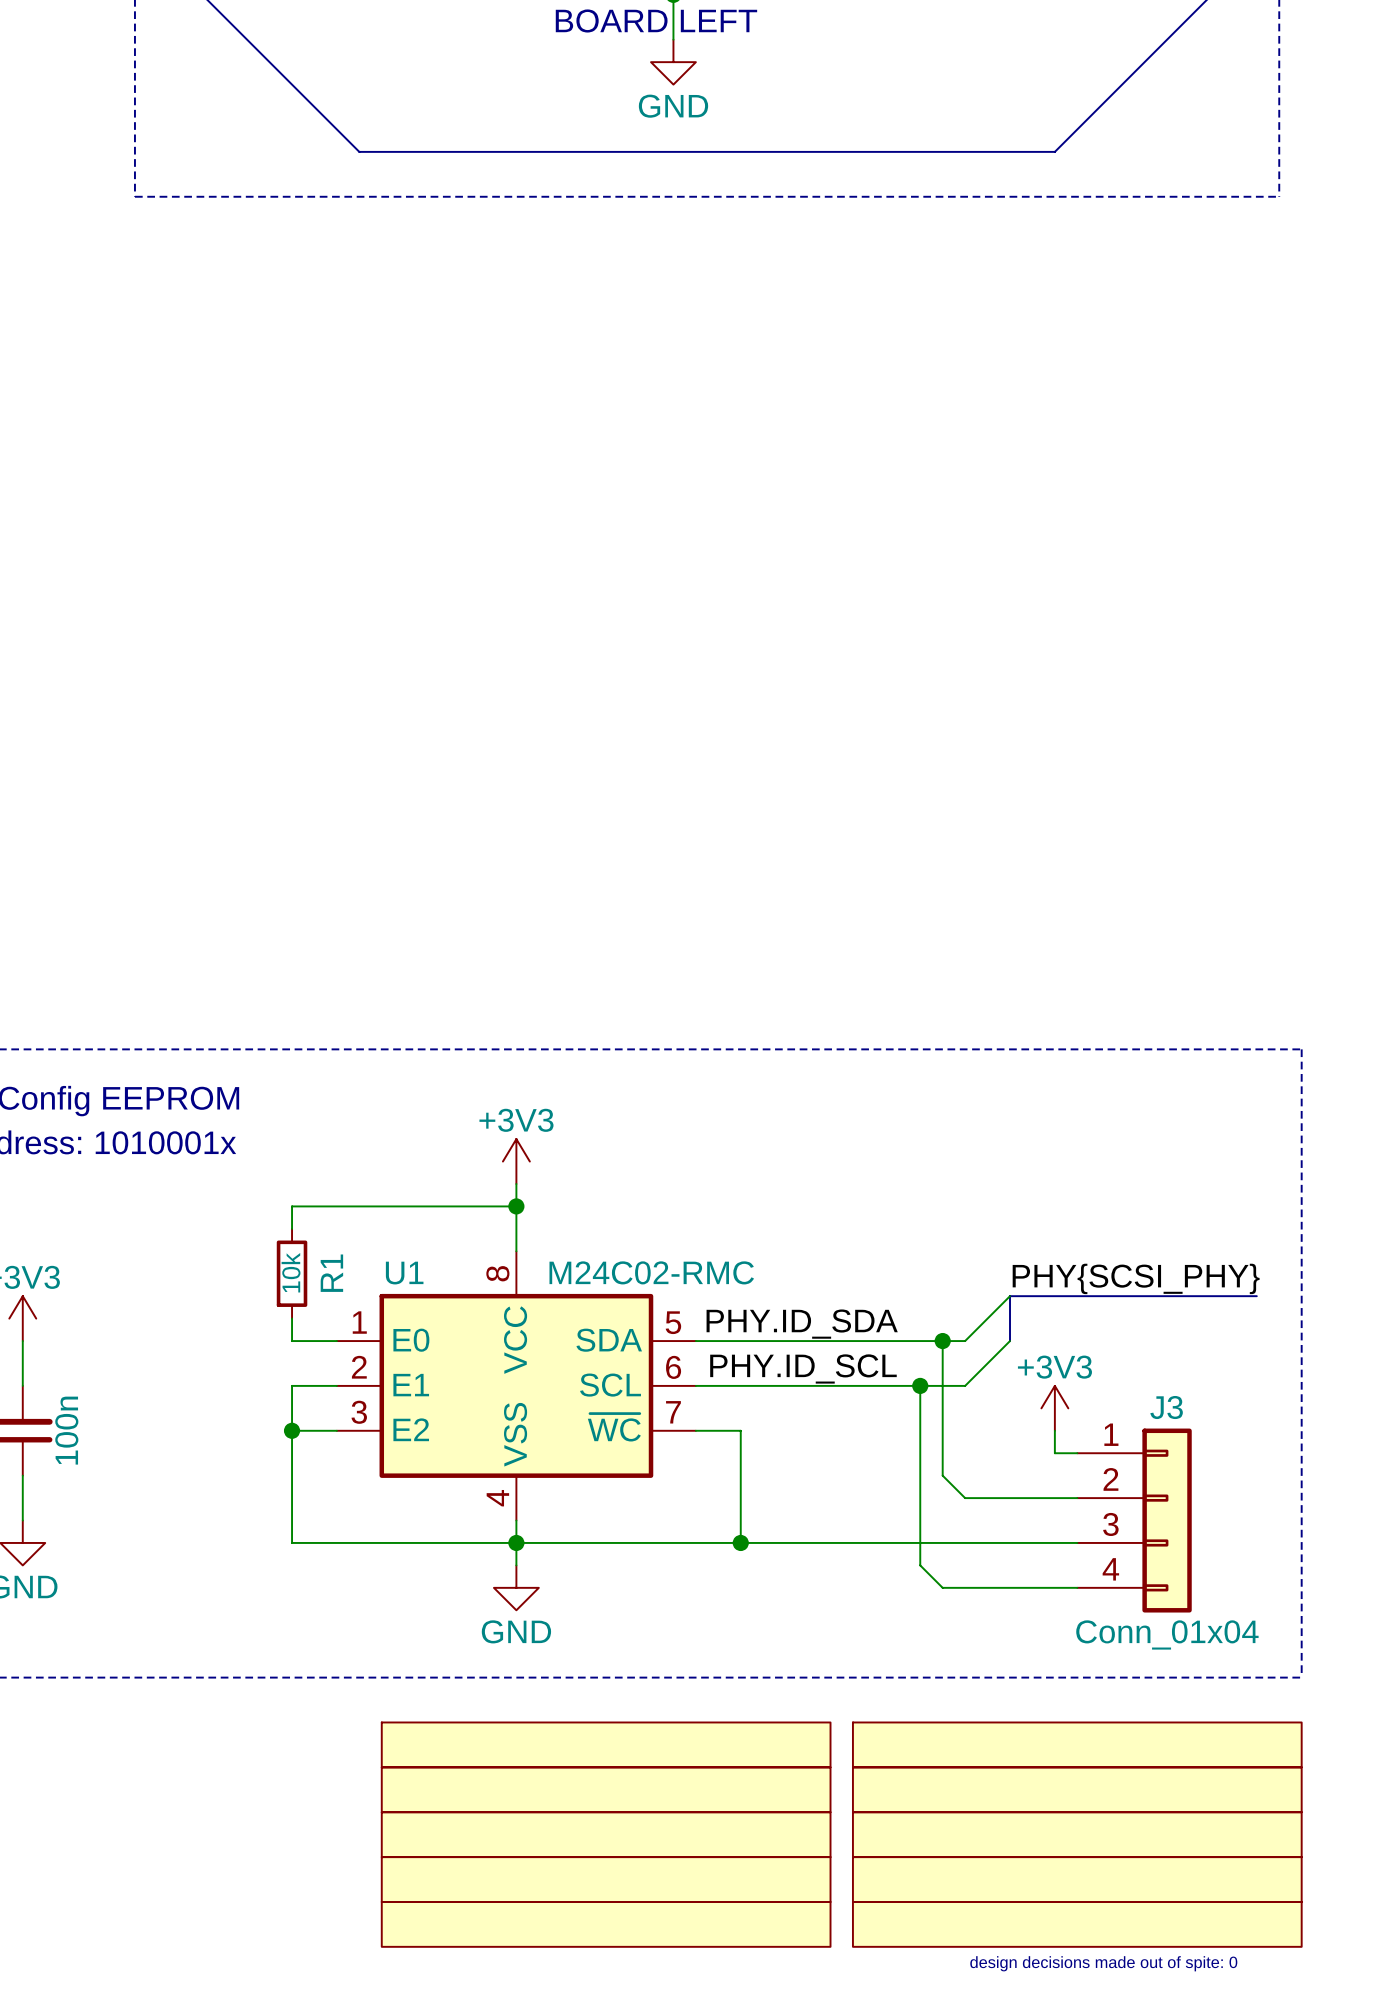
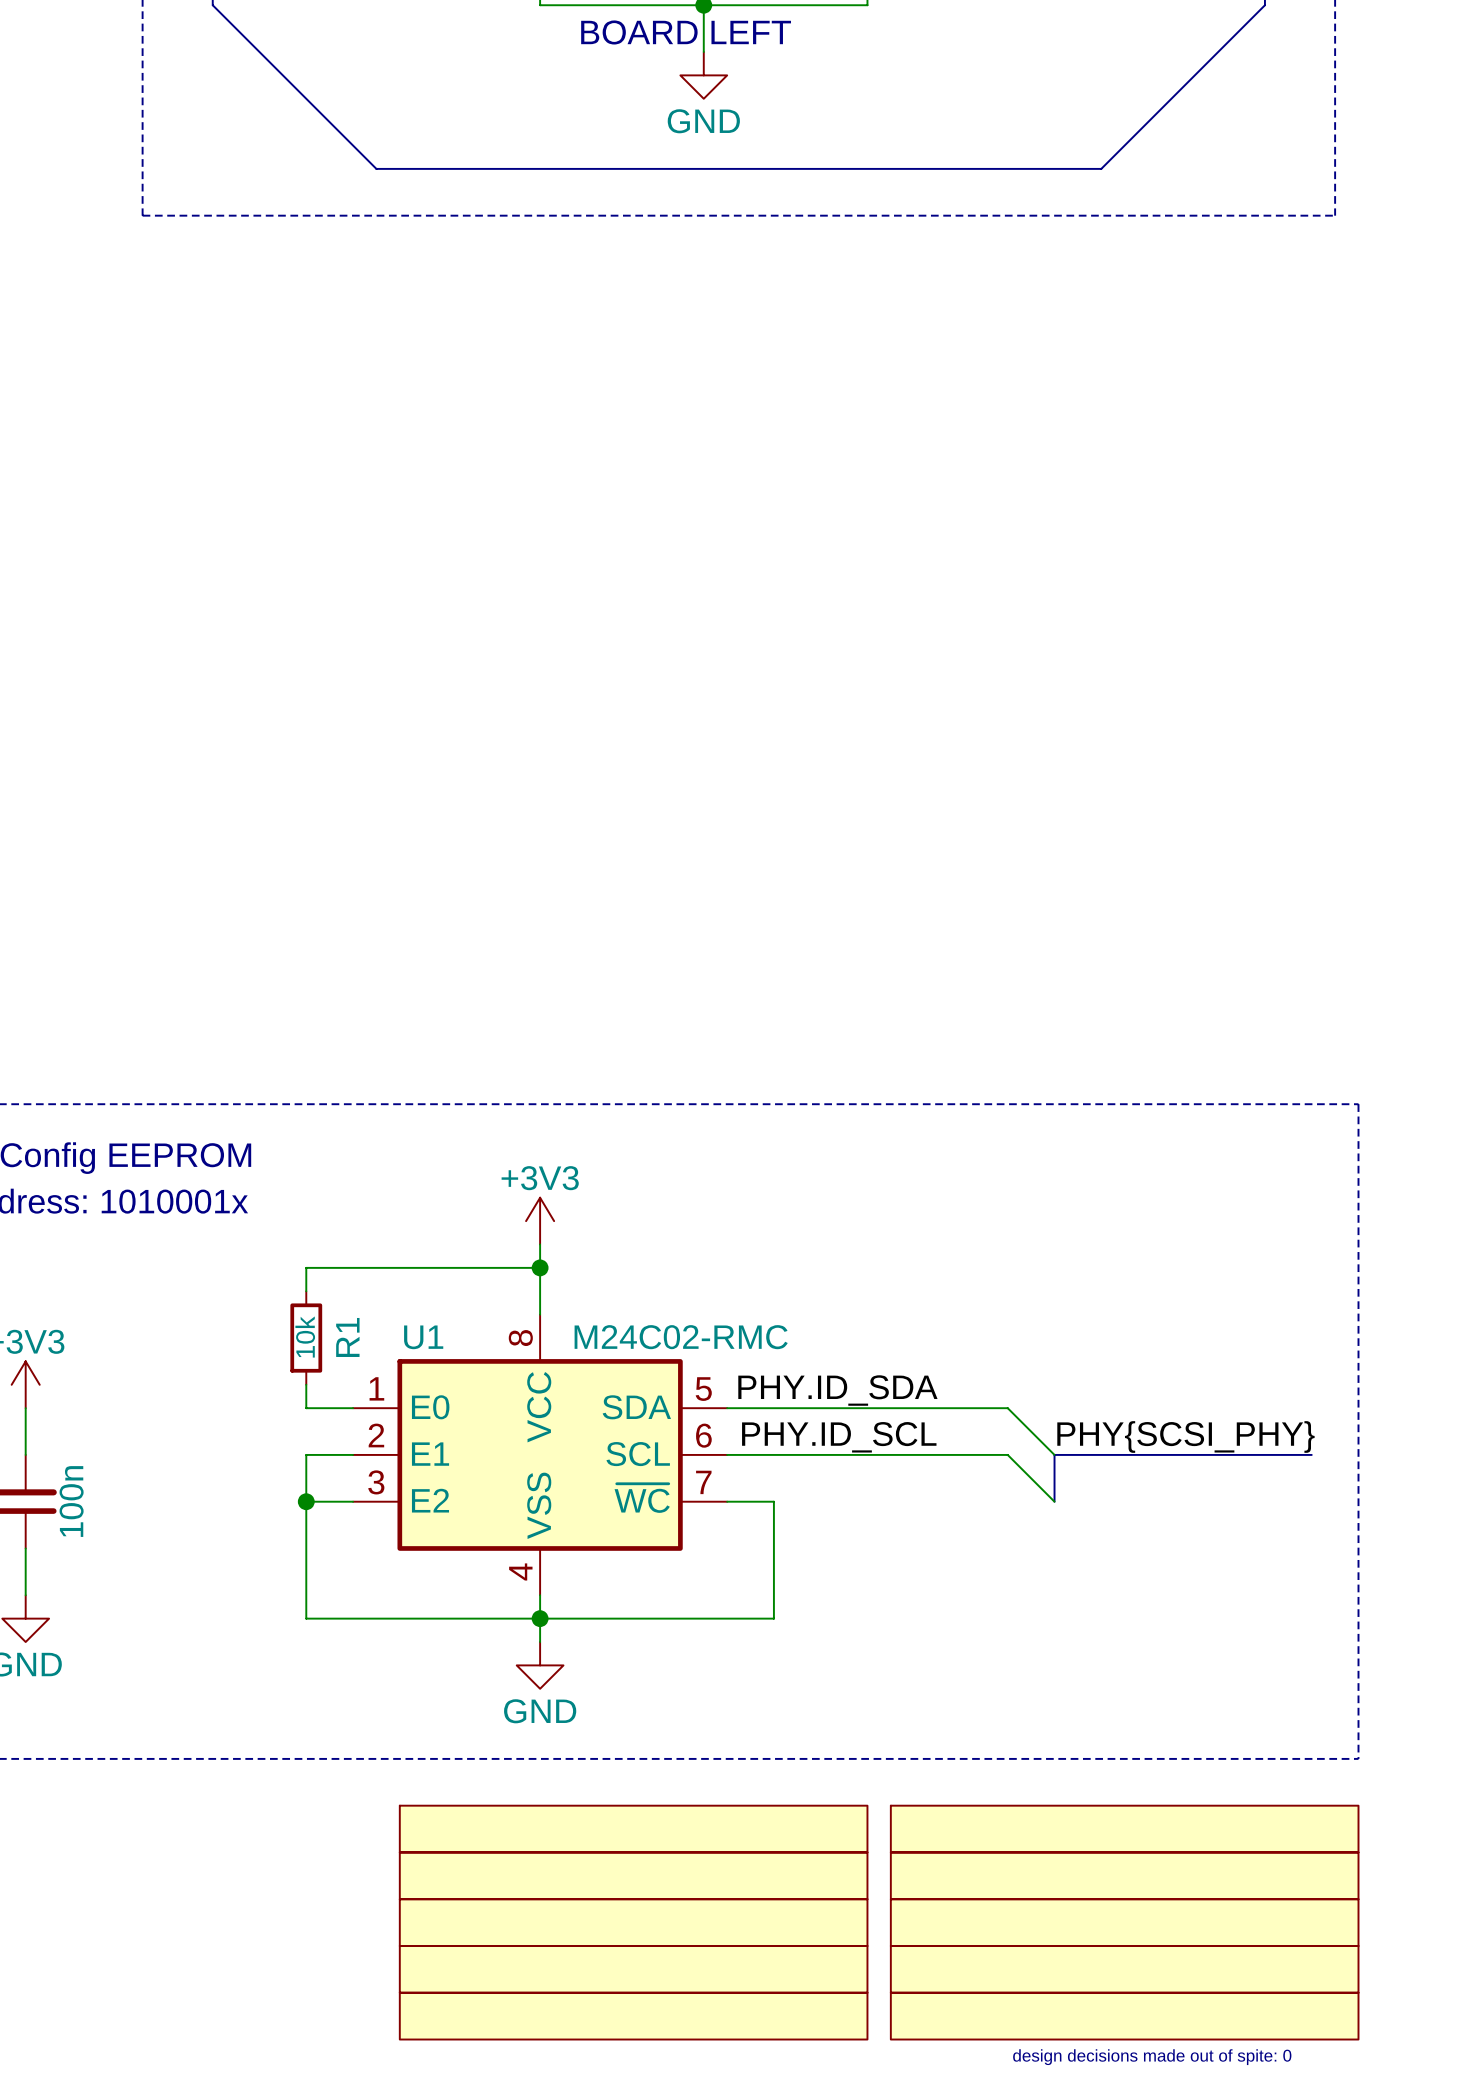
label position: PHY{SCSI_PHY} (1136, 1278) -> PHY{SCSI_PHY} (1185, 1436)
wire: (1010, 1296) (965, 1341) -> (1054, 1454) (1007, 1408)
bus: (1256, 1296) (1010, 1296) (1010, 1341) -> (1311, 1454) (1054, 1454) (1054, 1501)
wire: (942, 1341) (942, 1475) (965, 1498) (1077, 1498) -> none
junction: (942, 1341) -> none
wire: (1010, 1341) (965, 1385) -> (1054, 1501) (1007, 1454)
wire: (920, 1385) (920, 1565) (942, 1587) (1077, 1587) -> none
junction: (920, 1385) -> none
power symbol: +3V3 (1054, 1408) -> none
wire: (1054, 1430) (1054, 1453) (1077, 1453) -> none
J3: Conn_01x04 (1134, 1520) -> none
wire: (740, 1542) (1077, 1542) -> none
junction: (740, 1542) -> none

